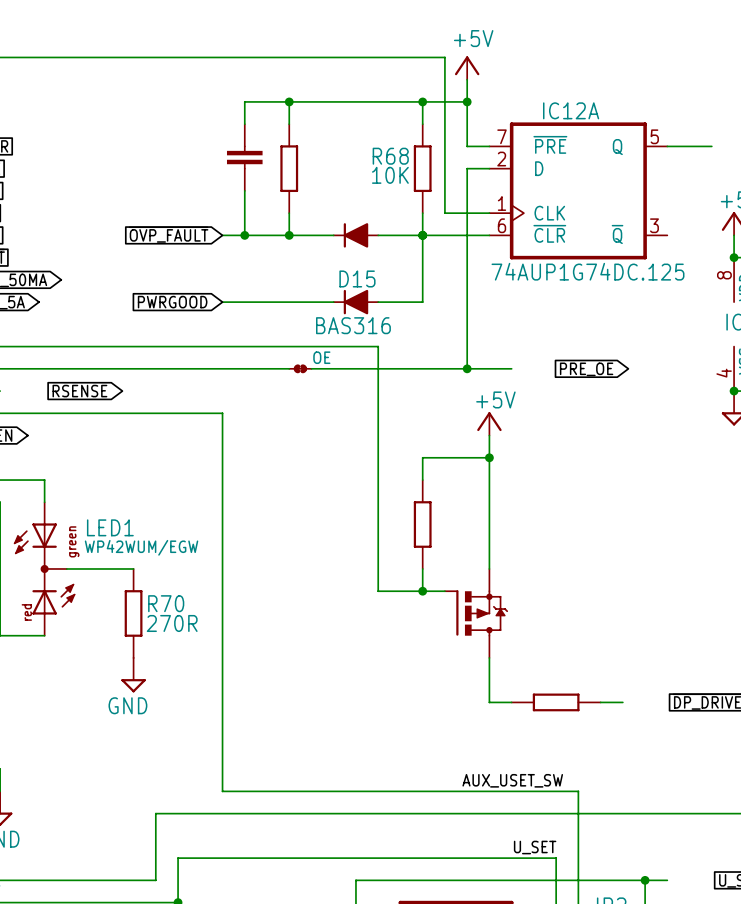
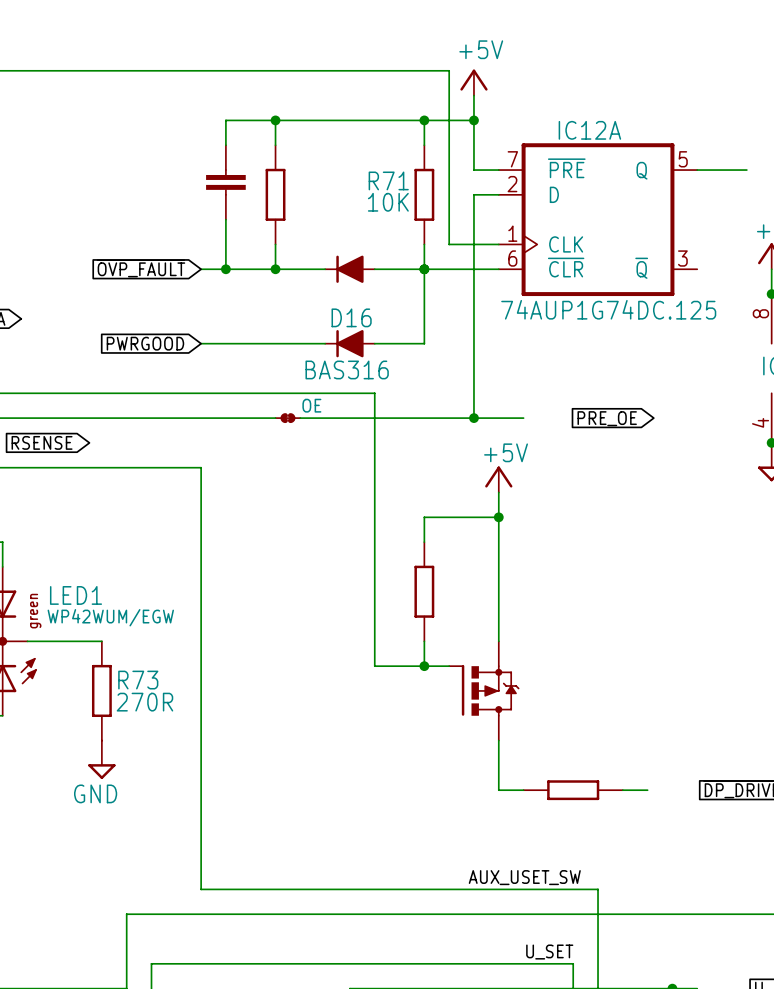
R68 name: R68 (390, 156) -> R71 (388, 180)
D15 name: D15 (357, 278) -> D16 (351, 317)
R70 name: R70 (166, 603) -> R73 (138, 680)

